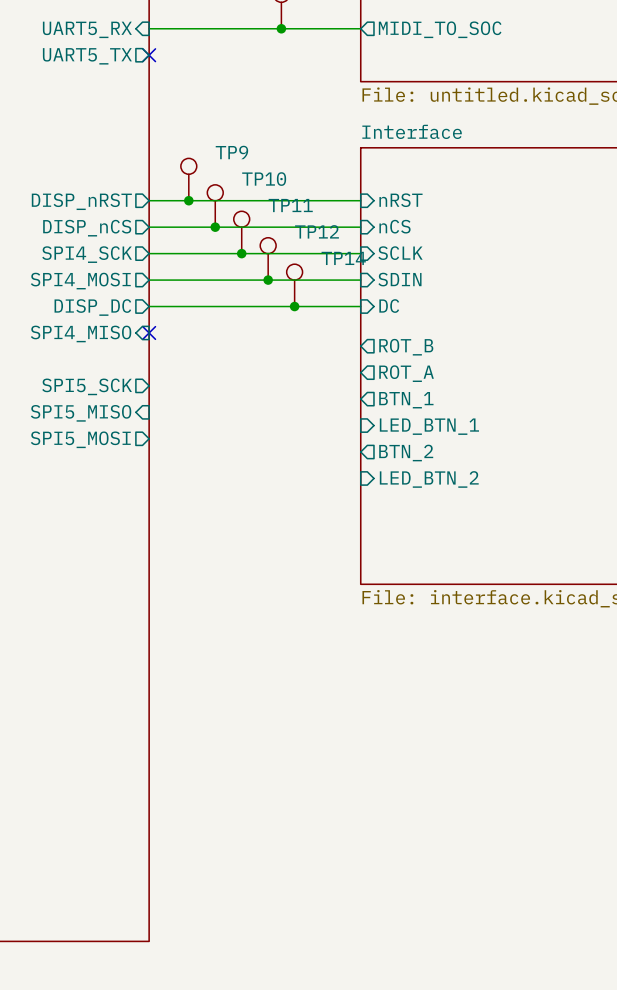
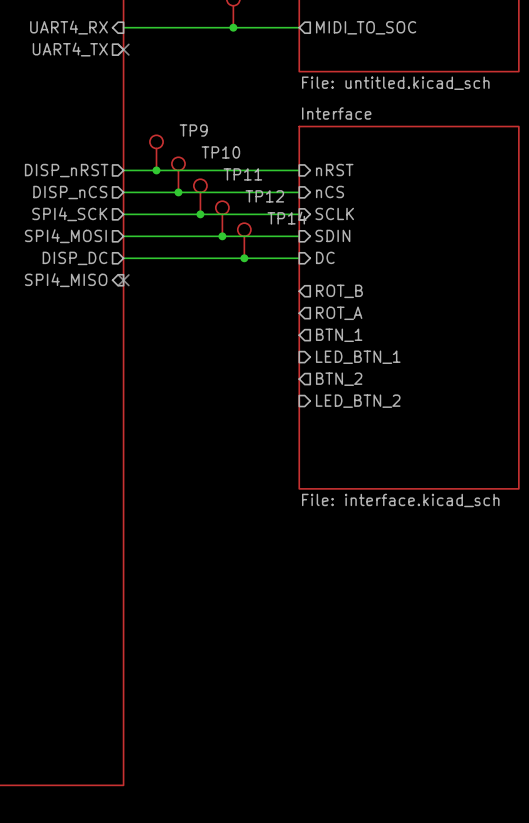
sheet pin: UART5_RX (87, 29) -> UART4_RX (69, 27)
sheet pin: UART5_TX (87, 56) -> UART4_TX (70, 49)
sheet pin: SPI5_SCK (87, 386) -> none
sheet pin: SPI5_MISO (81, 413) -> none
sheet pin: SPI5_MOSI (80, 439) -> none

